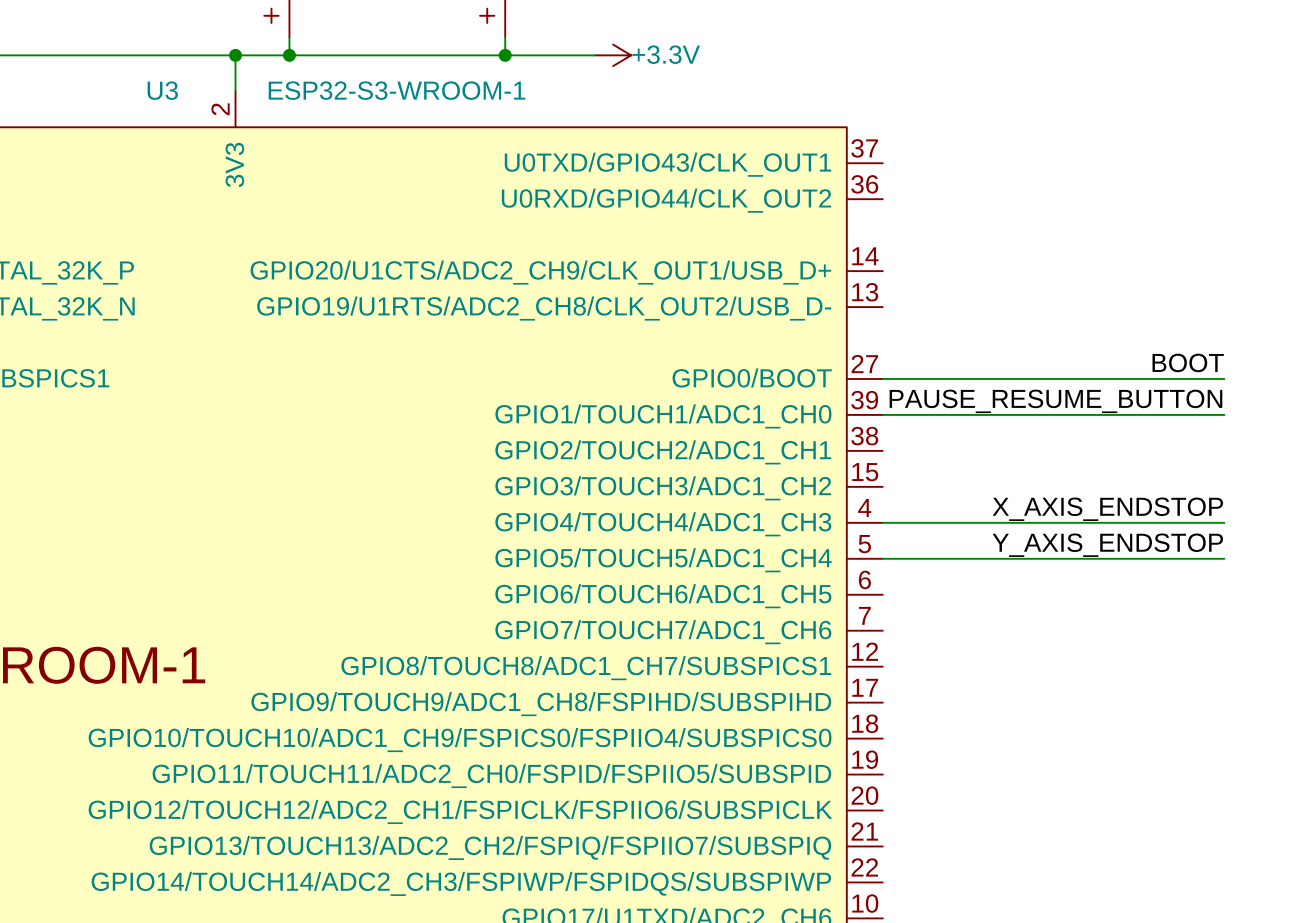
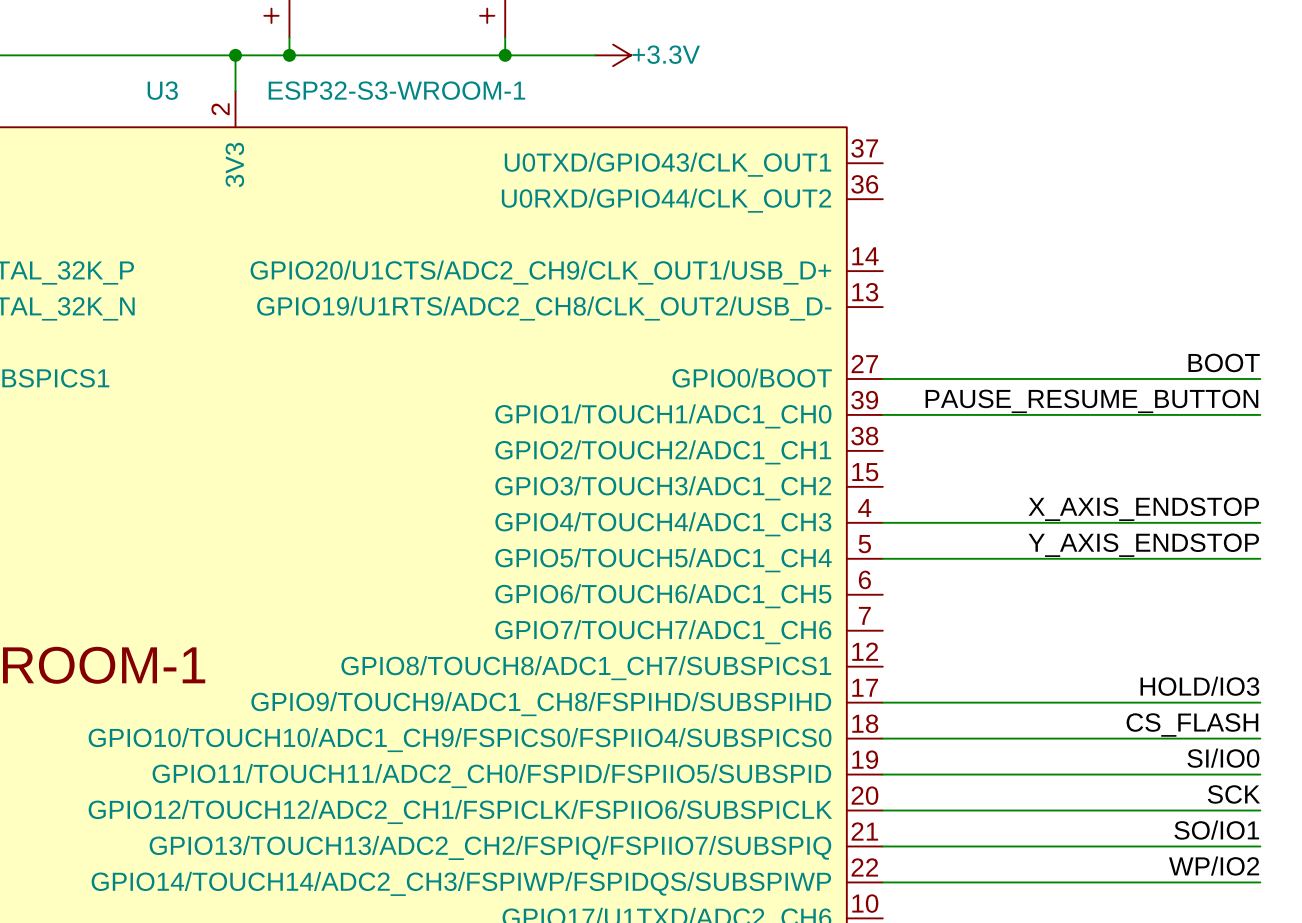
label position: BOOT (1188, 362) -> BOOT (1224, 362)
wire: none -> (1224, 378) (1260, 378)
label position: PAUSE_RESUME_BUTTON (1055, 401) -> PAUSE_RESUME_BUTTON (1091, 401)
wire: none -> (1224, 414) (1260, 414)
label position: X_AXIS_ENDSTOP (1107, 509) -> X_AXIS_ENDSTOP (1143, 509)
wire: none -> (1224, 522) (1260, 522)
label position: Y_AXIS_ENDSTOP (1107, 545) -> Y_AXIS_ENDSTOP (1143, 545)
wire: none -> (1224, 558) (1260, 558)
label: none -> HOLD/IO3 (1199, 686)
wire: none -> (882, 702) (1260, 702)
label: none -> CS_FLASH (1192, 725)
wire: none -> (882, 738) (1260, 738)
label: none -> SI/IO0 (1223, 758)
wire: none -> (882, 774) (1260, 774)
label: none -> SCK (1233, 794)
wire: none -> (882, 810) (1260, 810)
label: none -> SO/IO1 (1216, 830)
wire: none -> (882, 846) (1260, 846)
label: none -> WP/IO2 (1214, 866)
wire: none -> (882, 882) (1260, 882)

